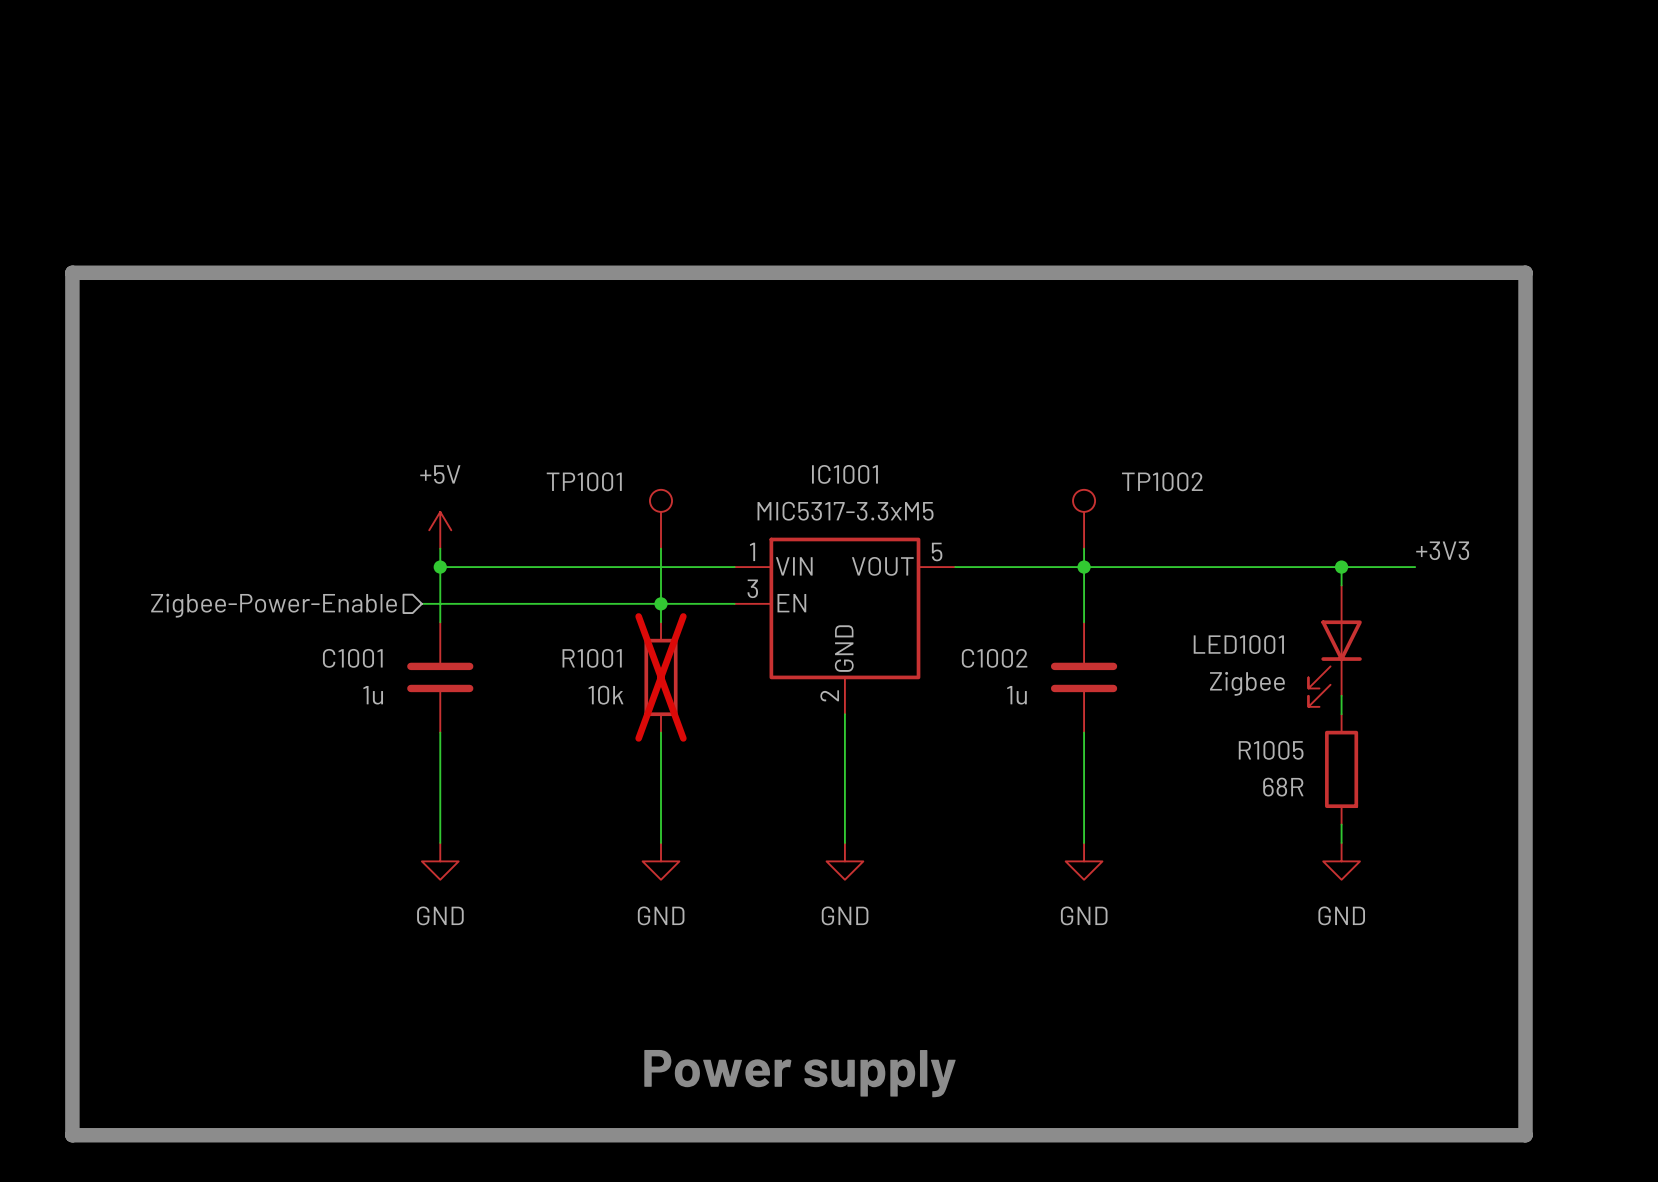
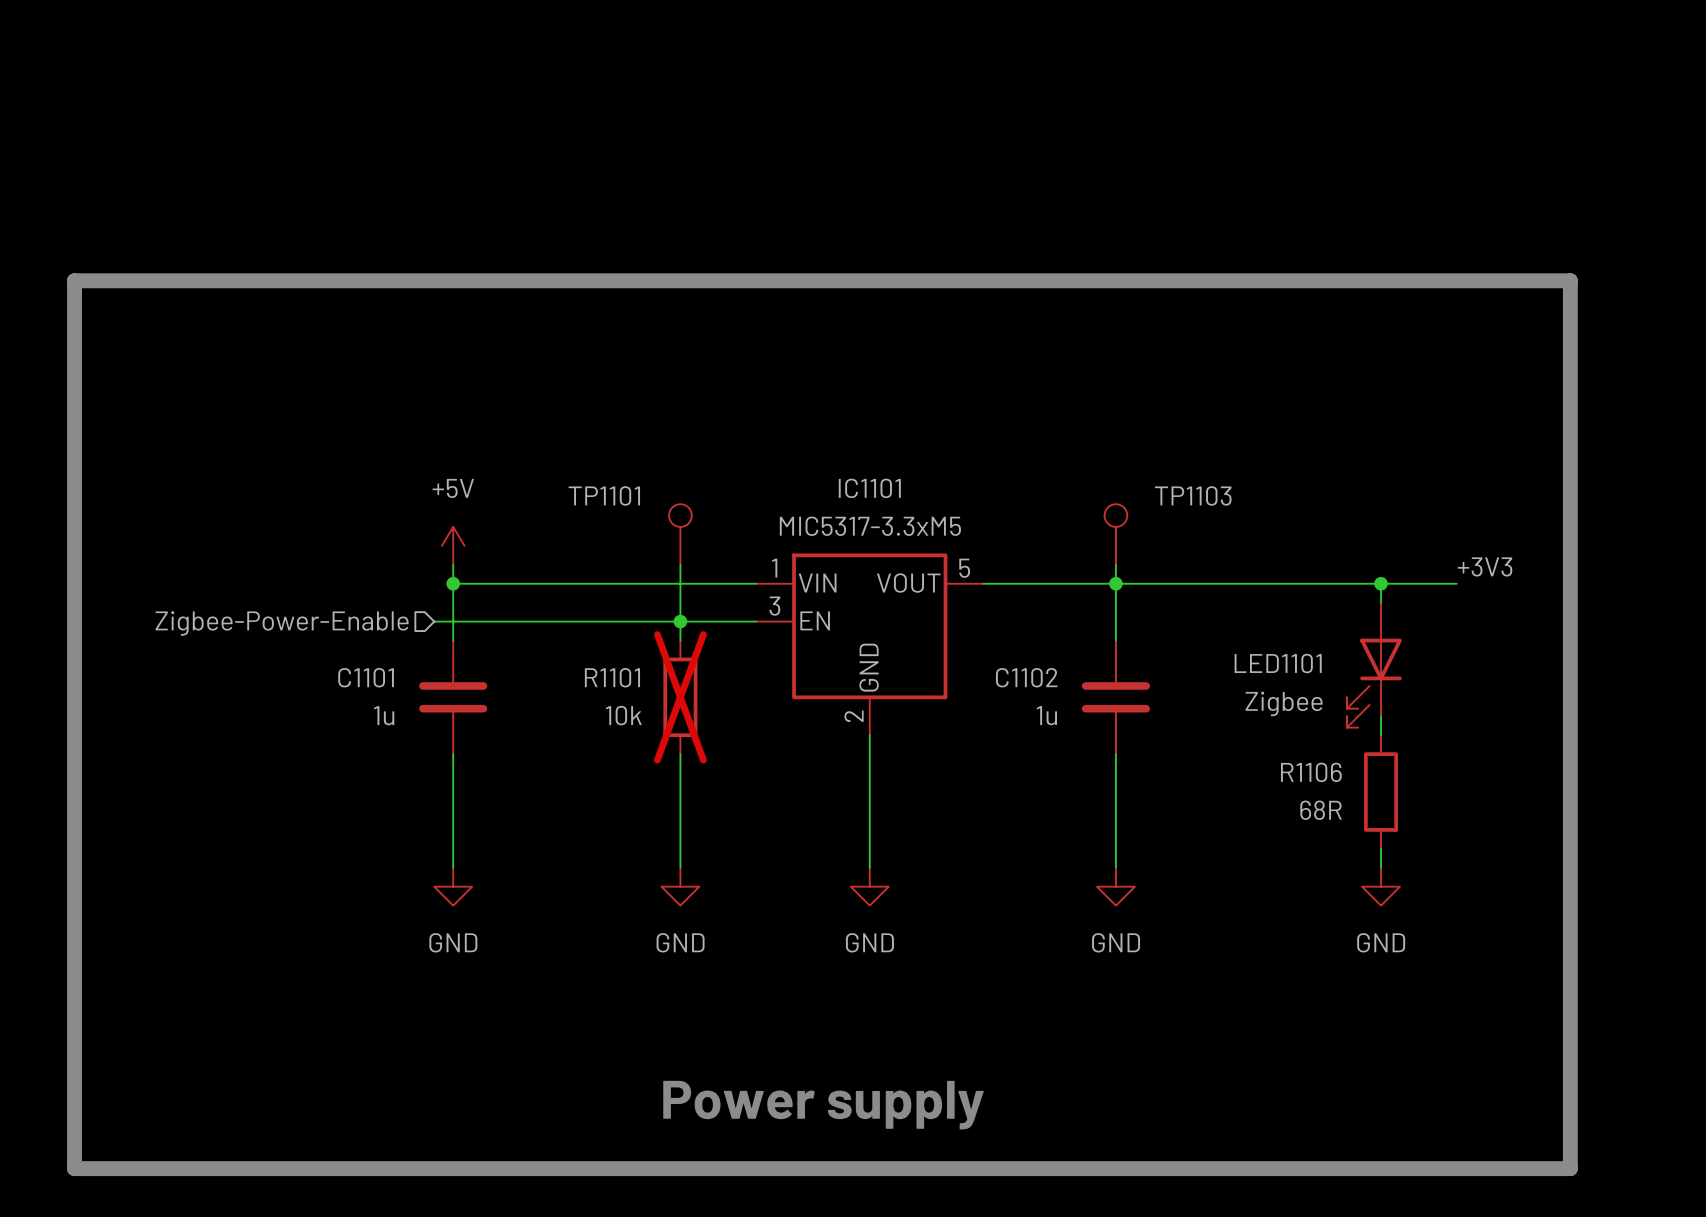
IC1001 name: IC1001 (844, 474) -> IC1101 (869, 488)
TP1001 name: TP1001 (584, 481) -> TP1101 (604, 495)
TP1002 name: TP1002 (1162, 481) -> TP1103 (1193, 495)
LED1001 name: LED1001 (1238, 644) -> LED1101 (1278, 663)
C1001 name: C1001 (352, 658) -> C1101 (366, 677)
R1001 name: R1001 (592, 658) -> R1101 (612, 677)
C1002 name: C1002 (994, 658) -> C1102 (1026, 677)
R1005 name: R1005 (1271, 750) -> R1106 (1311, 772)

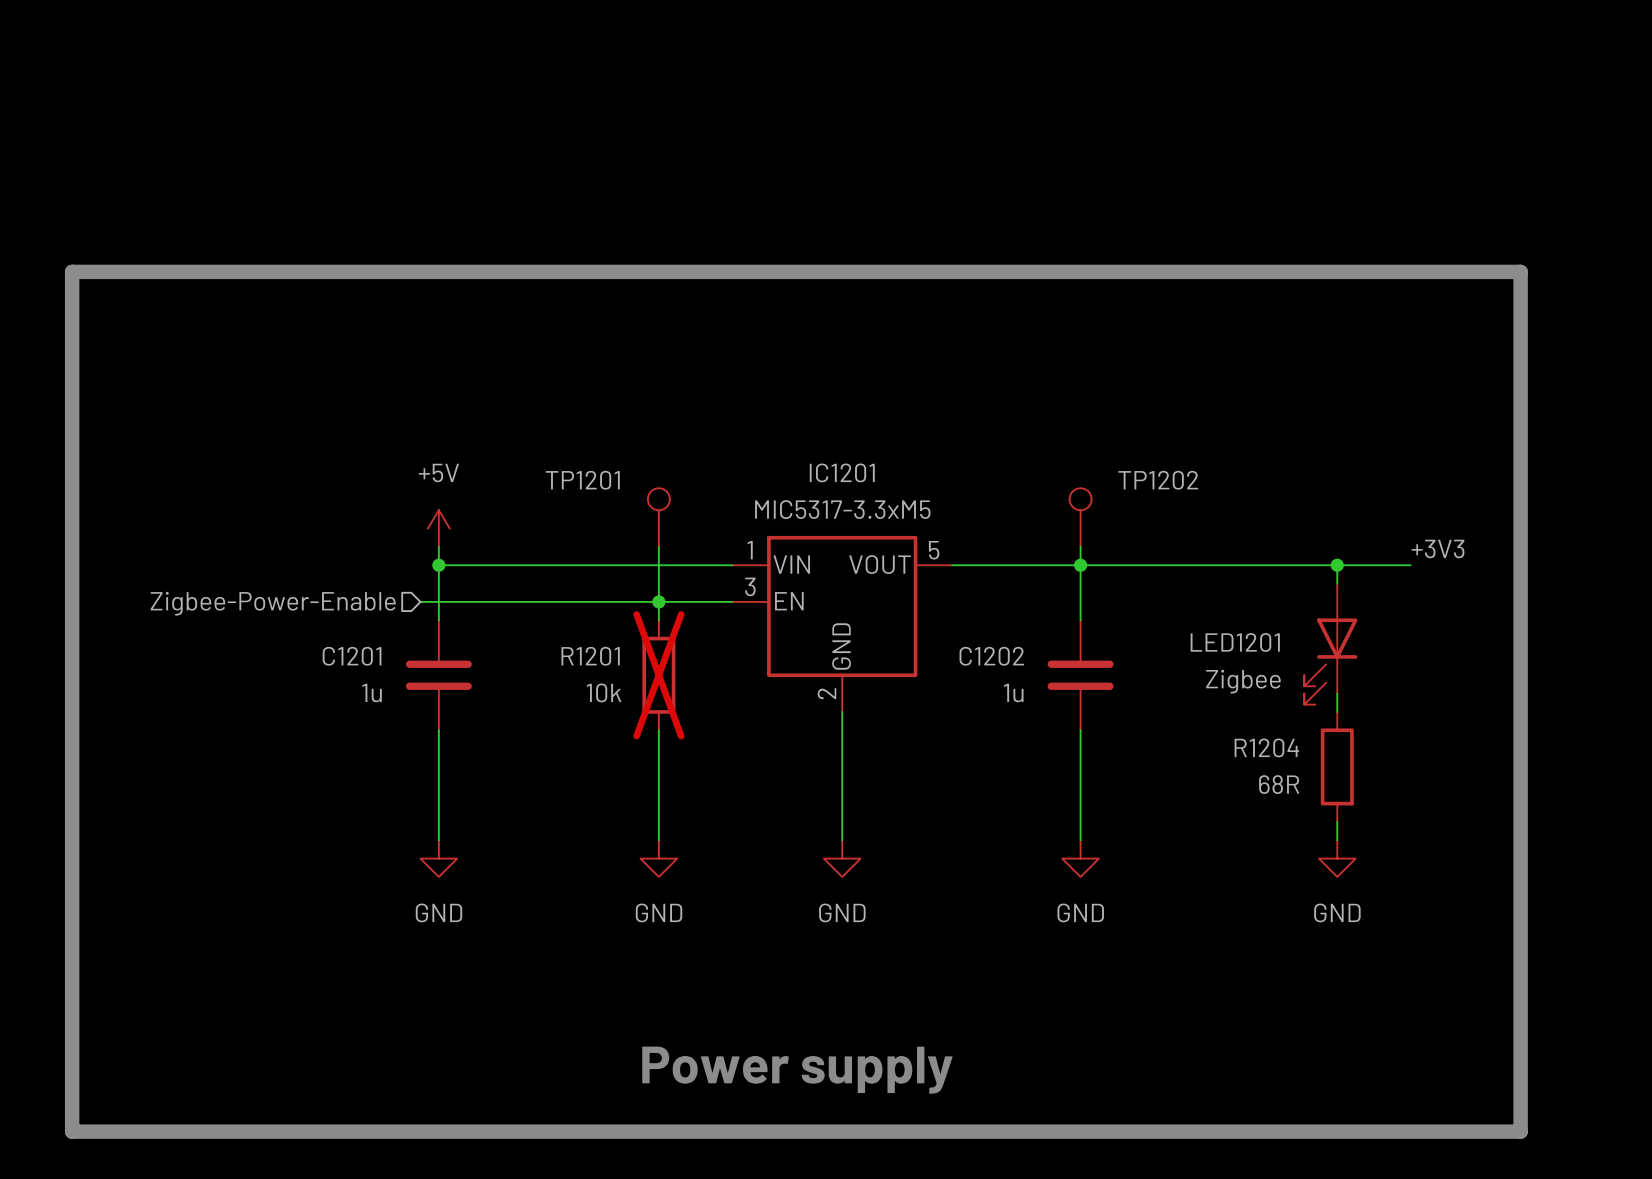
IC1101 name: IC1101 (869, 488) -> IC1201 (842, 472)
TP1101 name: TP1101 (604, 495) -> TP1201 (582, 480)
TP1103 name: TP1103 (1193, 495) -> TP1202 (1158, 480)
LED1101 name: LED1101 (1278, 663) -> LED1201 (1235, 642)
C1101 name: C1101 (366, 677) -> C1201 (352, 656)
R1101 name: R1101 (612, 677) -> R1201 (590, 656)
C1102 name: C1102 (1026, 677) -> C1202 (991, 656)
R1106 name: R1106 (1311, 772) -> R1204 (1266, 747)

